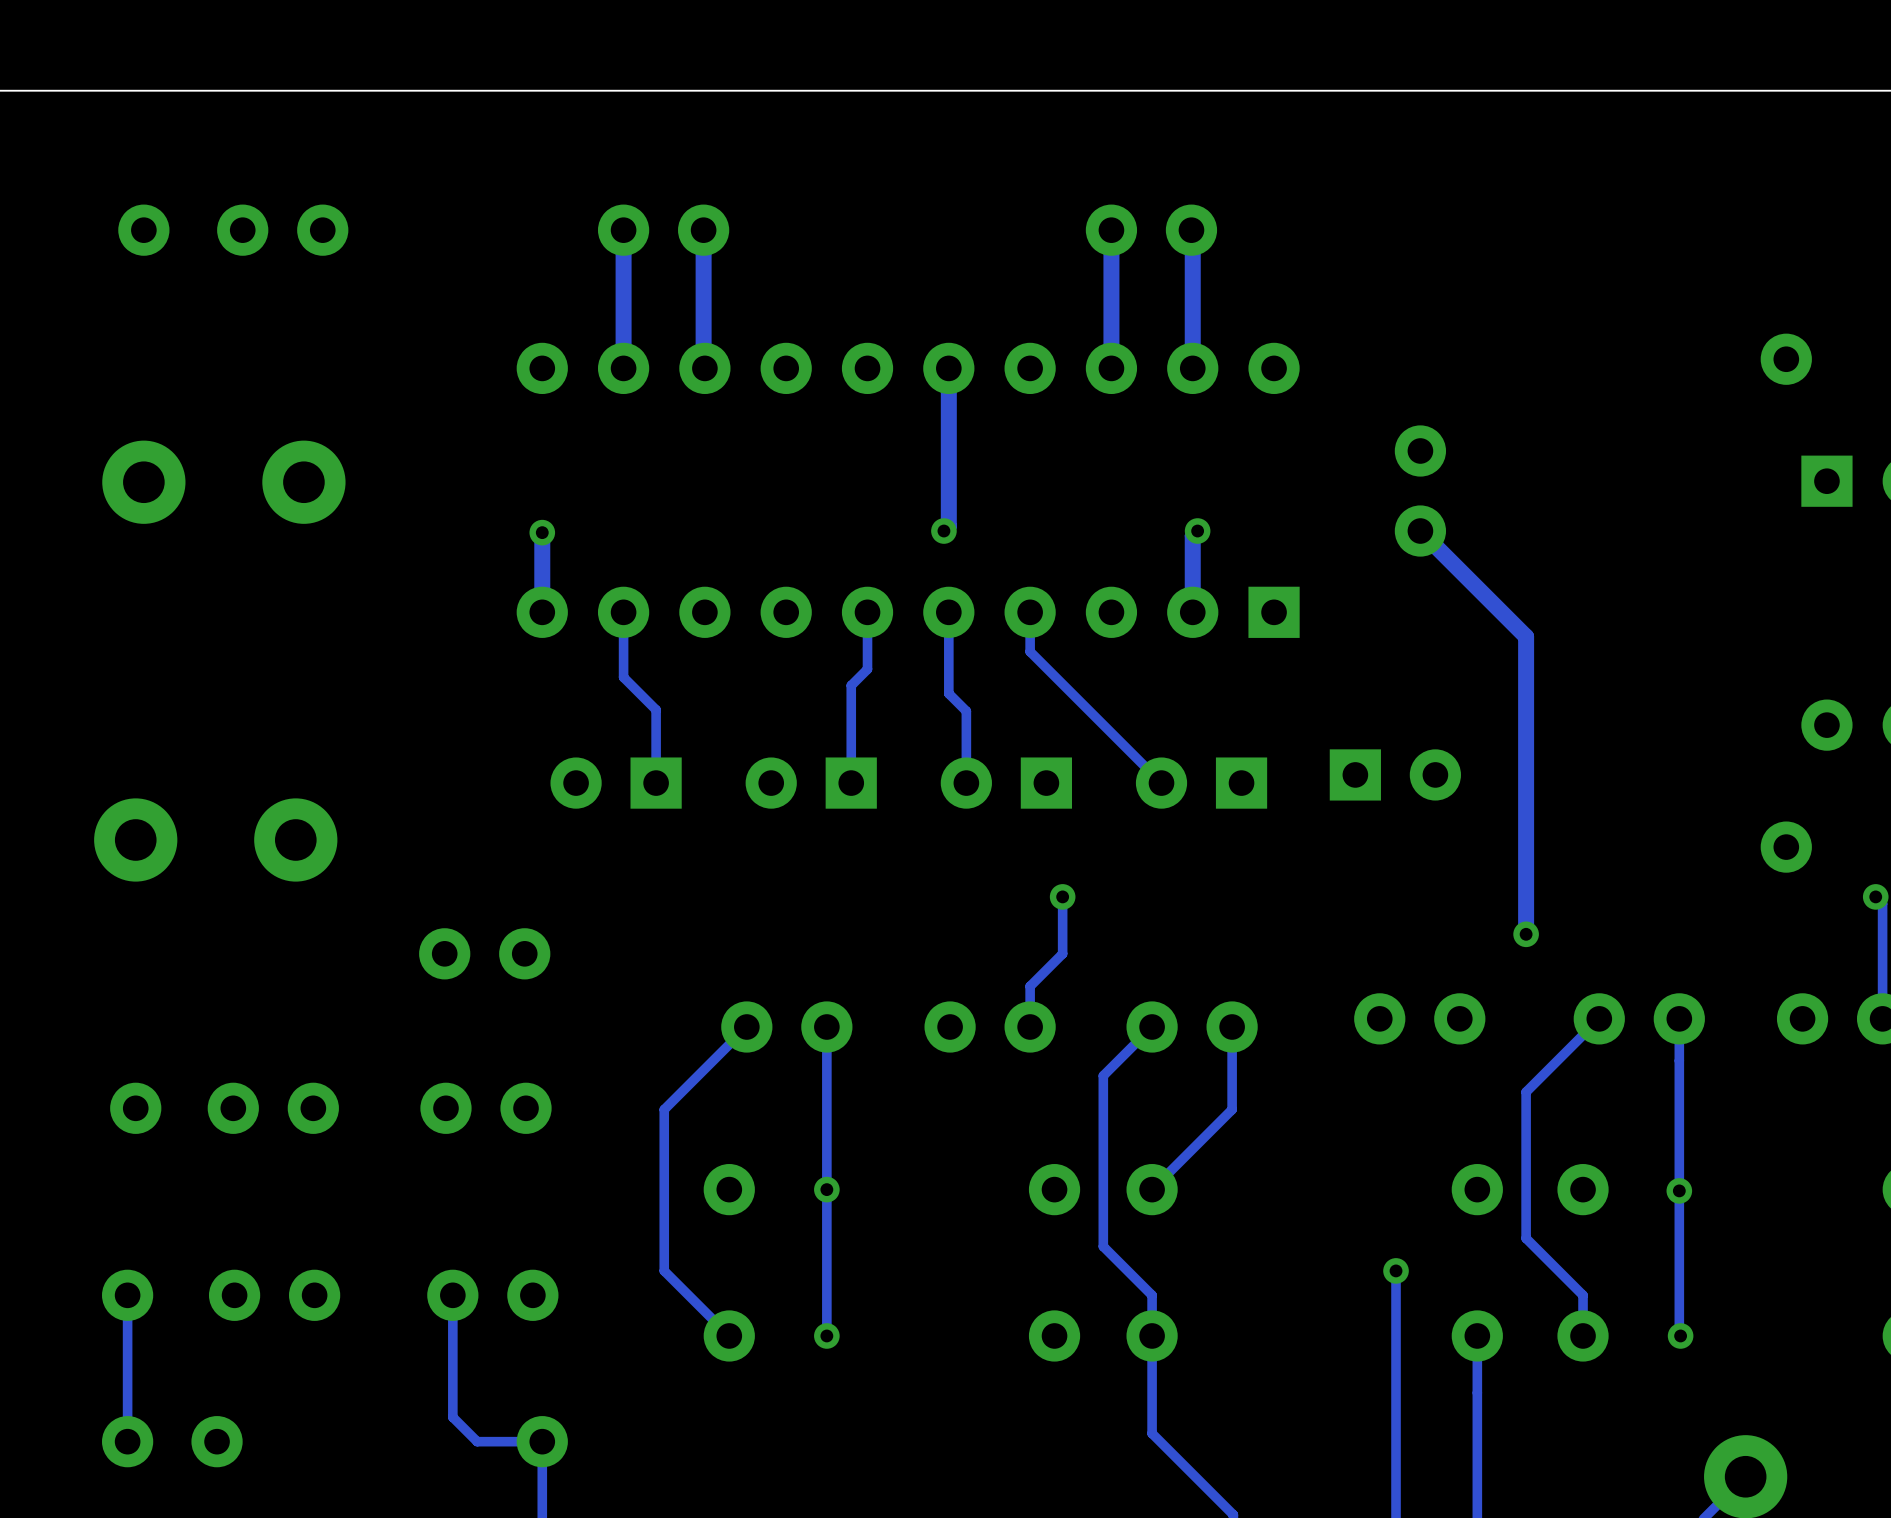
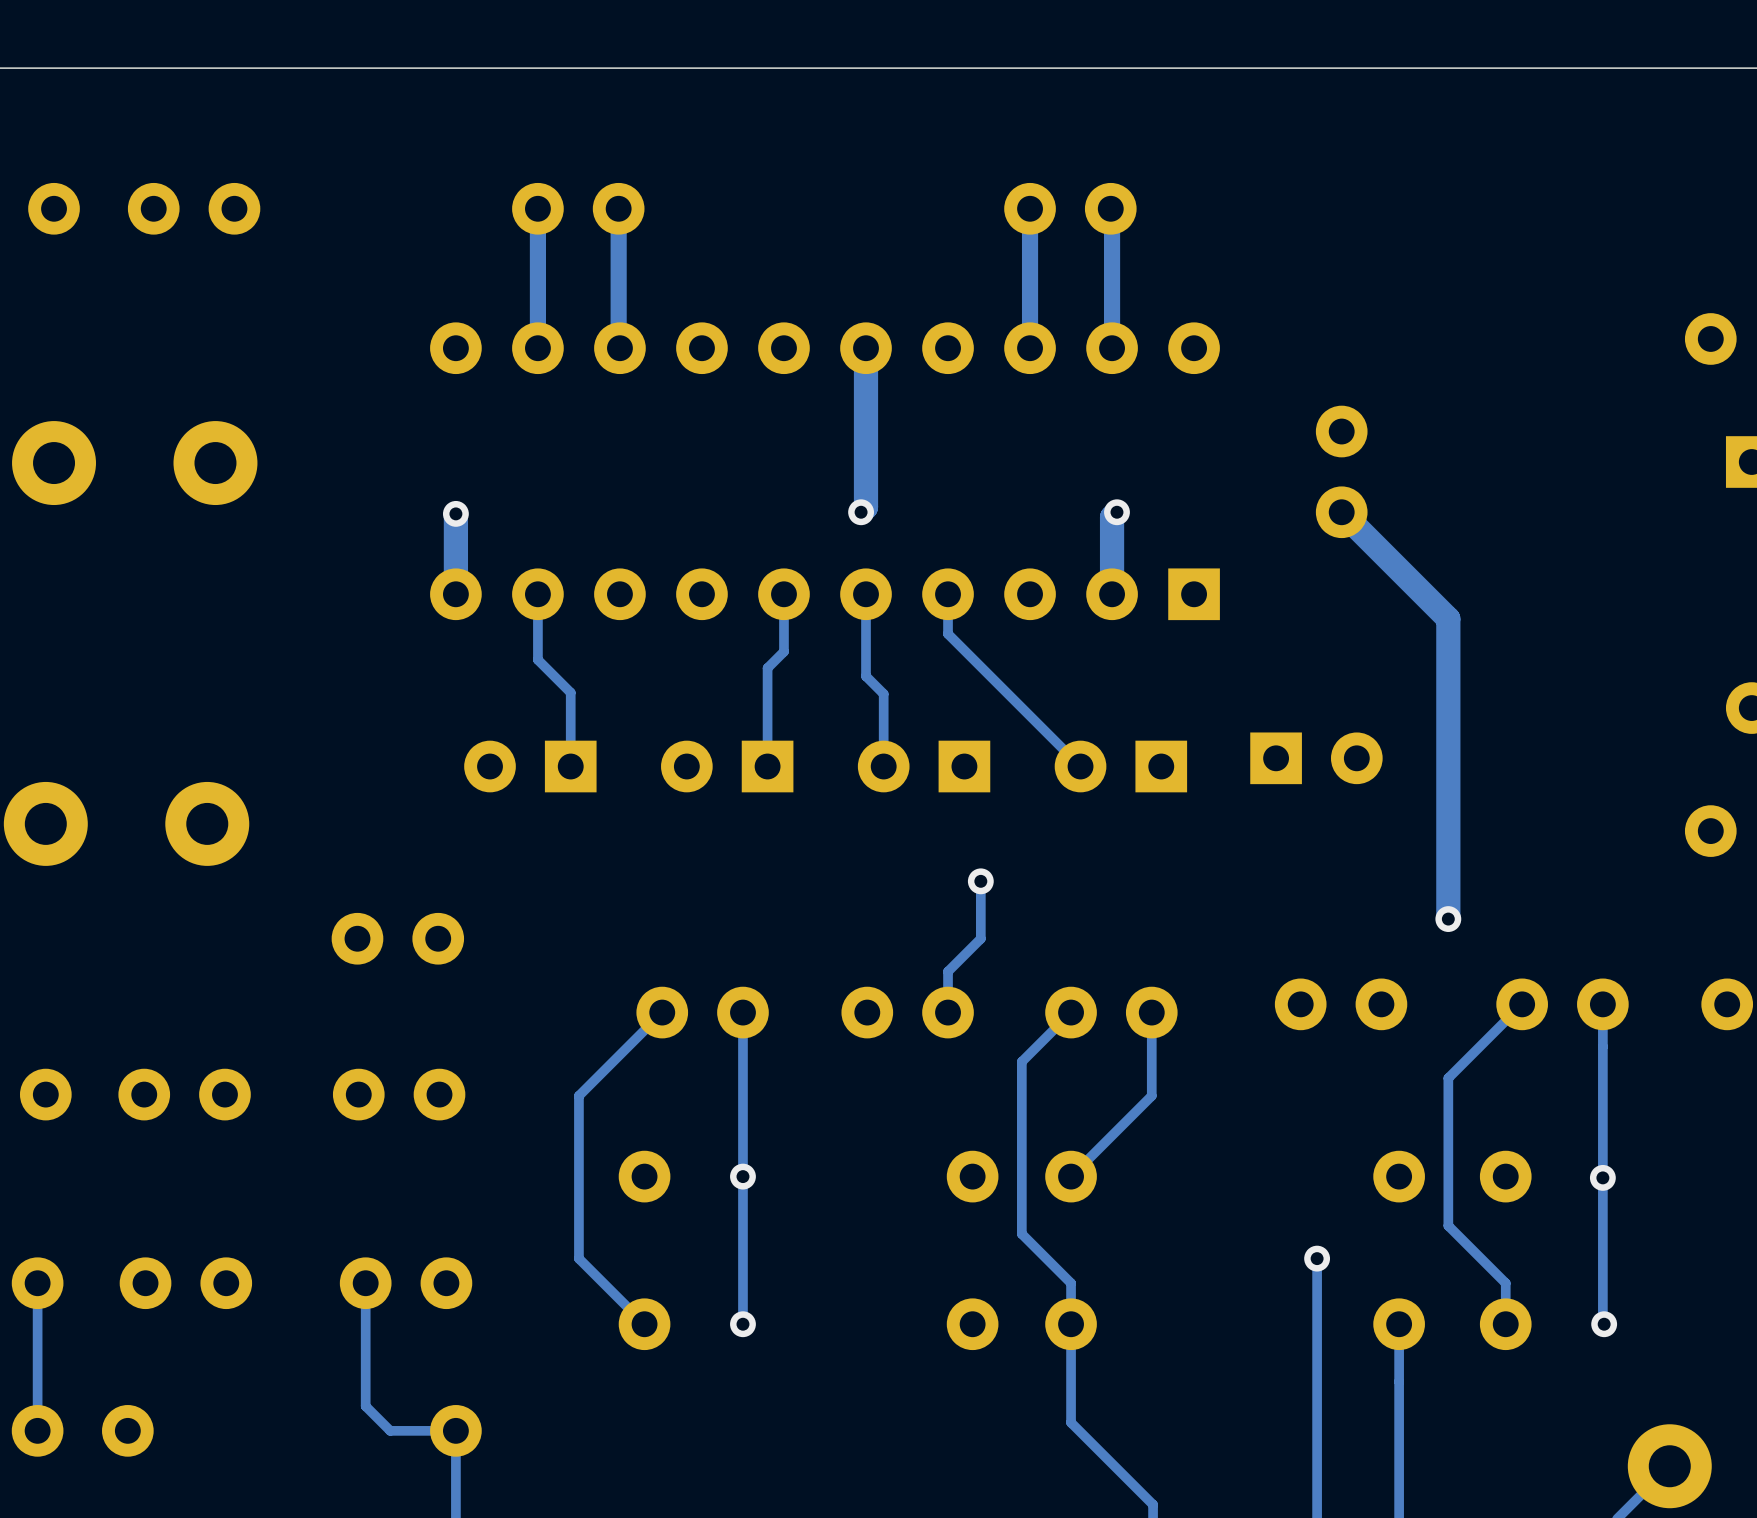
track width: thin (948, 368) (948, 526) (943, 531) -> thick (866, 348) (866, 507) (861, 512)
track width: thin (1197, 531) (1192, 535) (1192, 612) -> thick (1116, 512) (1112, 517) (1112, 594)
track width: thin (1420, 531) (1526, 636) (1526, 934) -> thick (1341, 512) (1448, 618) (1448, 919)
track width: thin (542, 532) (542, 612) -> thick (455, 513) (455, 594)

